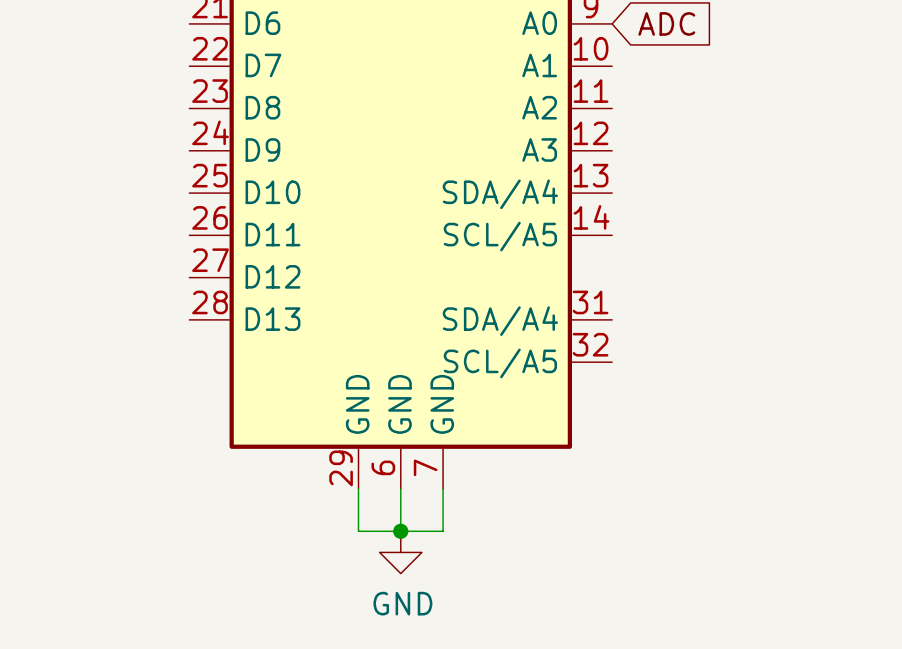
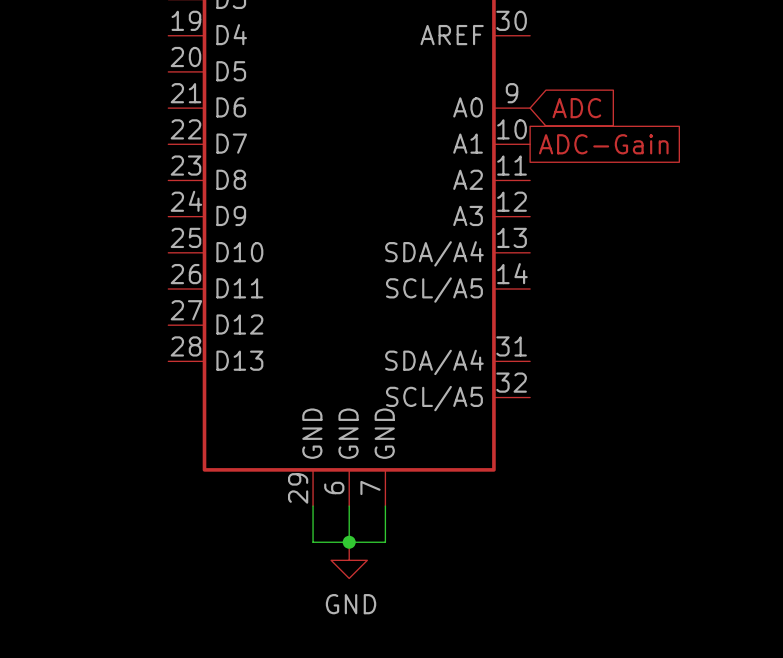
global label: none -> ADC-Gain (603, 144)

